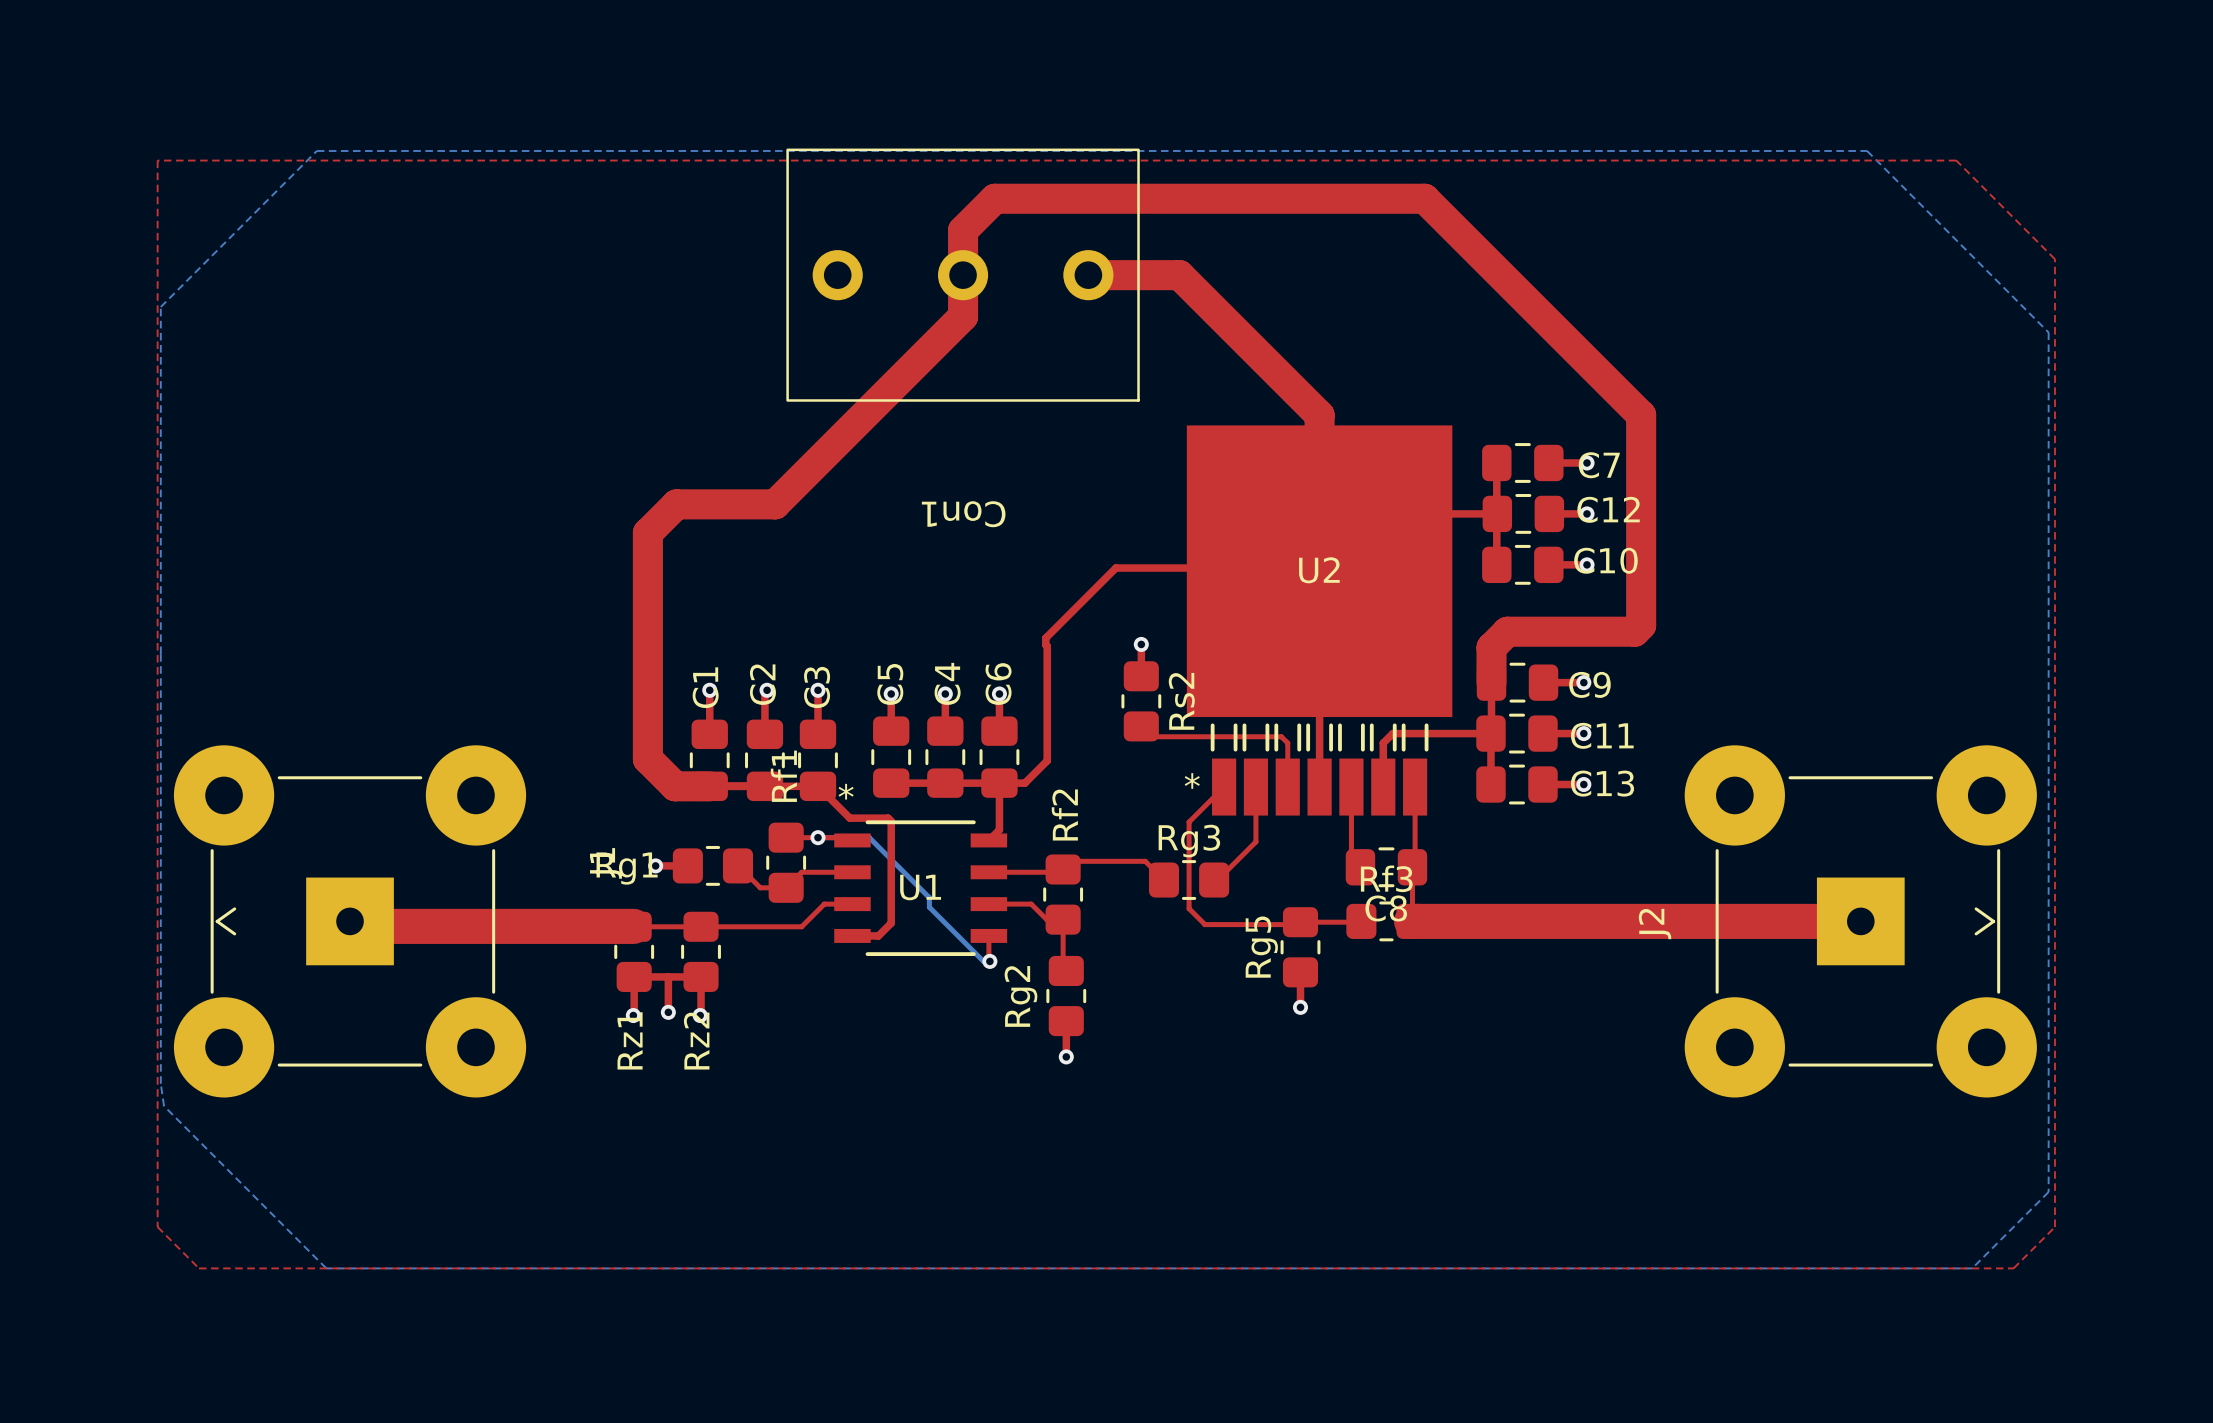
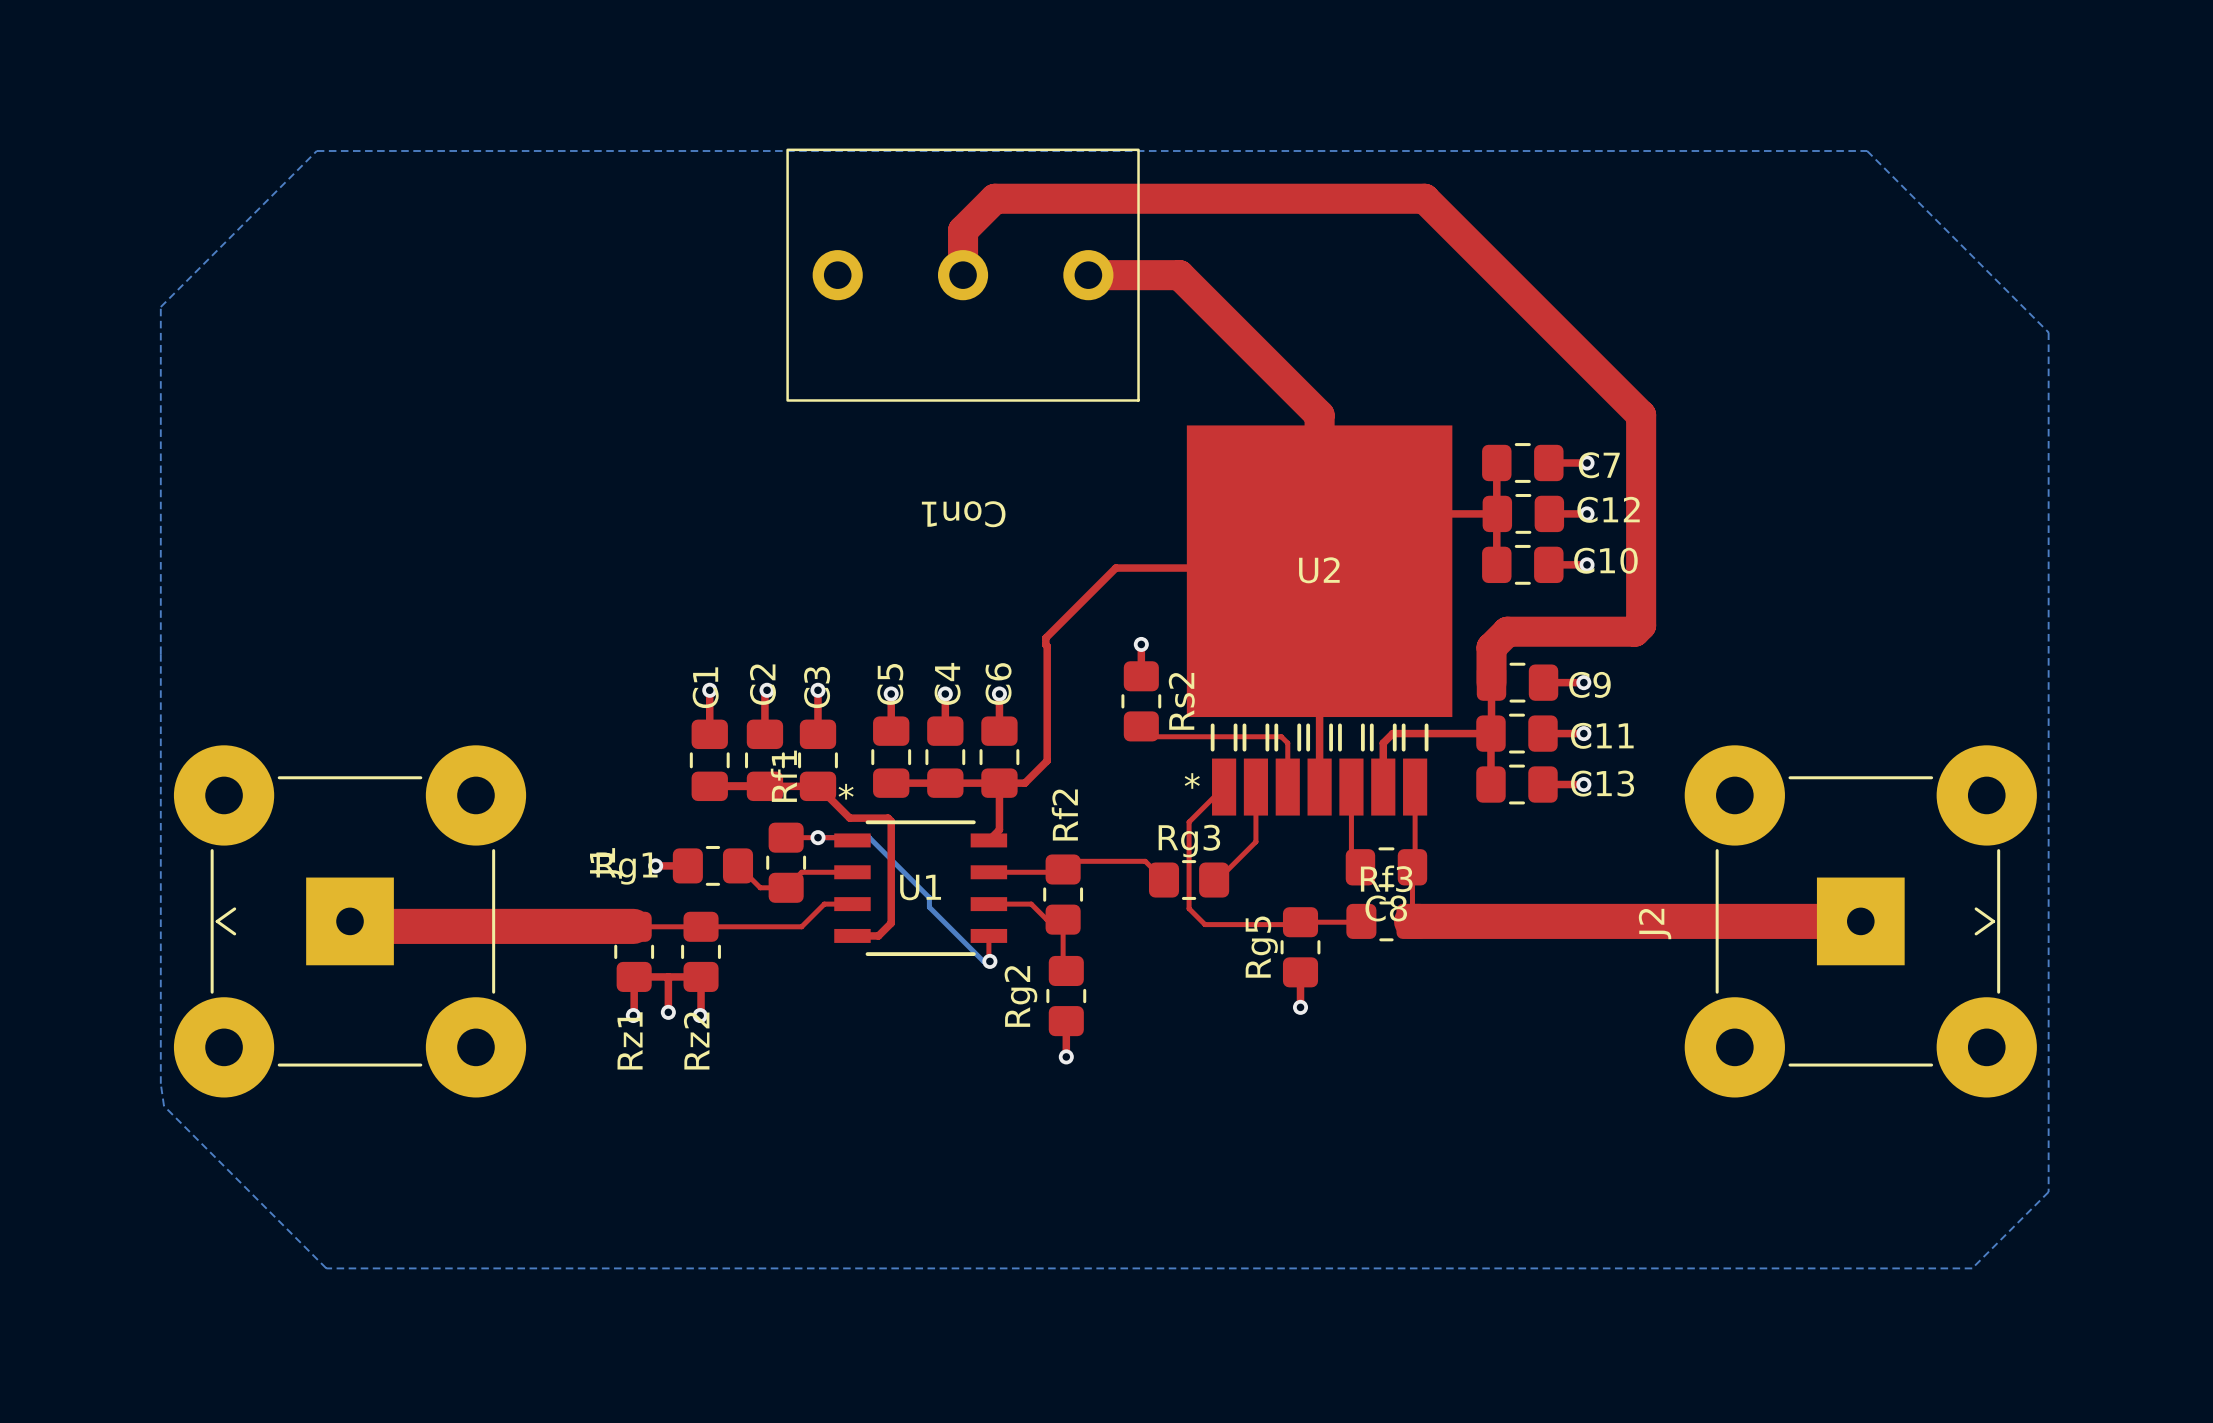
top zone outline: (157, 160) (1956, 160) (2054, 259) (2054, 1227) (2013, 1268) (199, 1268) (157, 1227) (157, 160) -> none
top track: (963, 275) (963, 316) (775, 504) (676, 504) (647, 533) (647, 759) (675, 786) (709, 786) -> none

